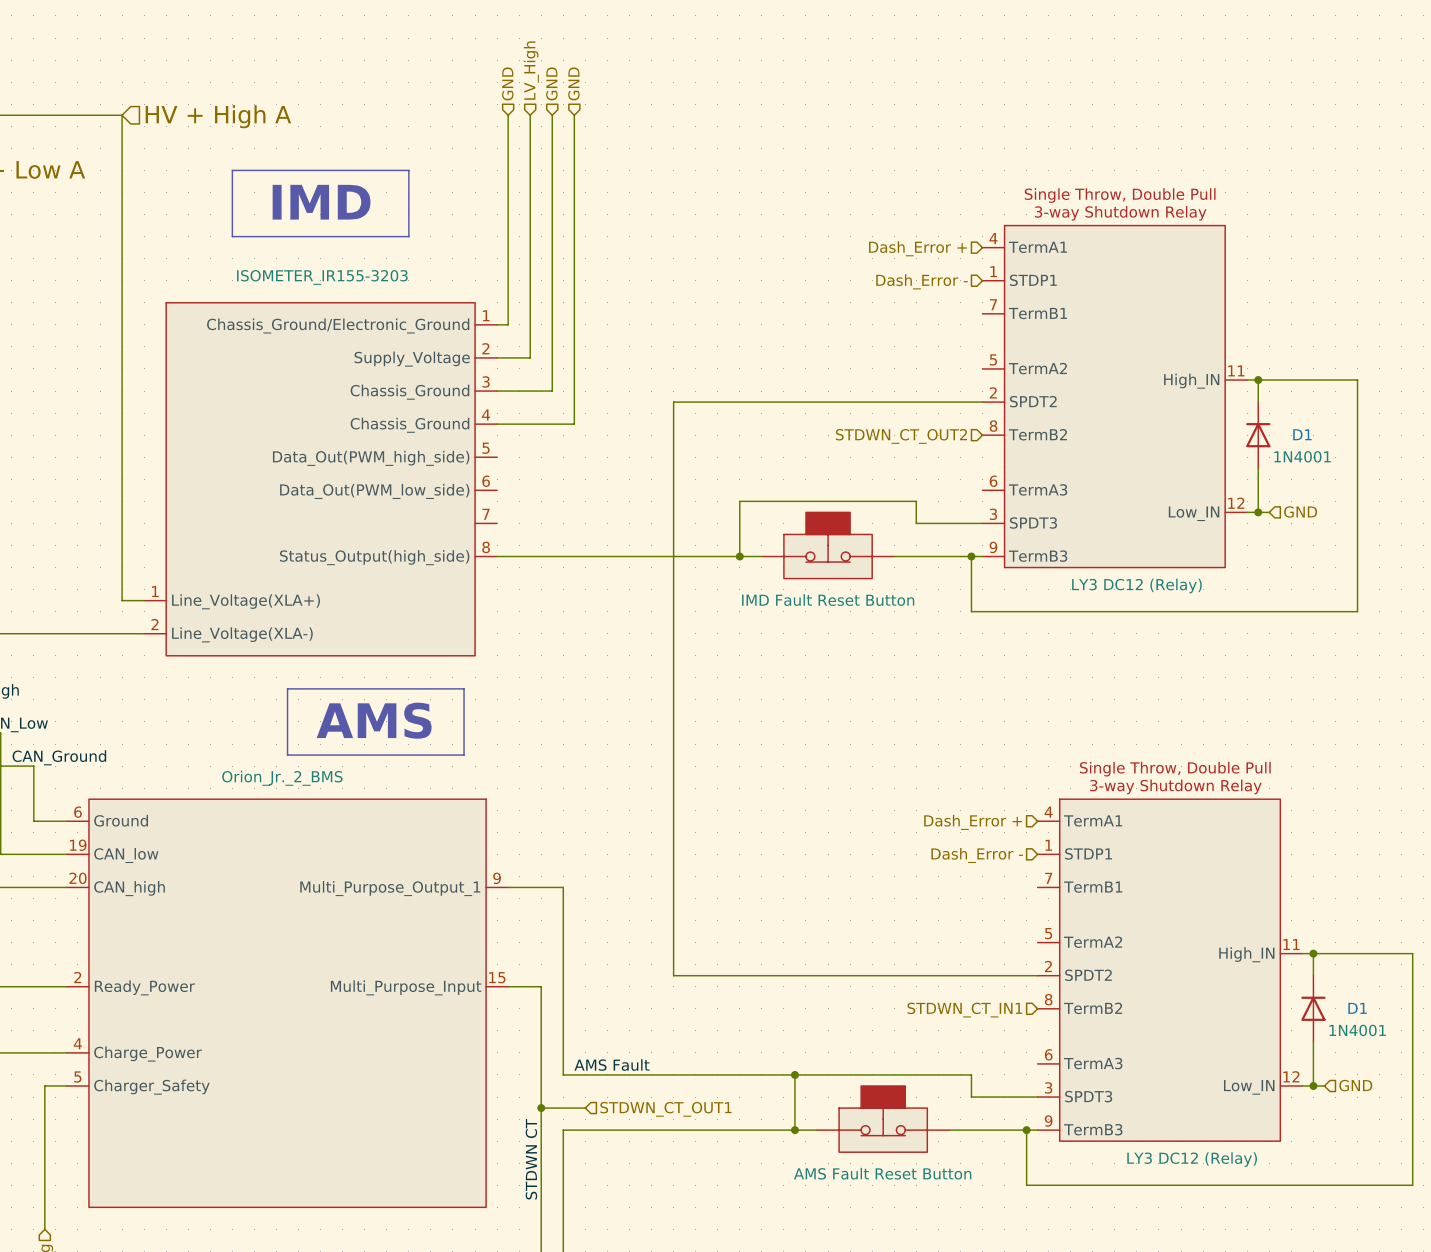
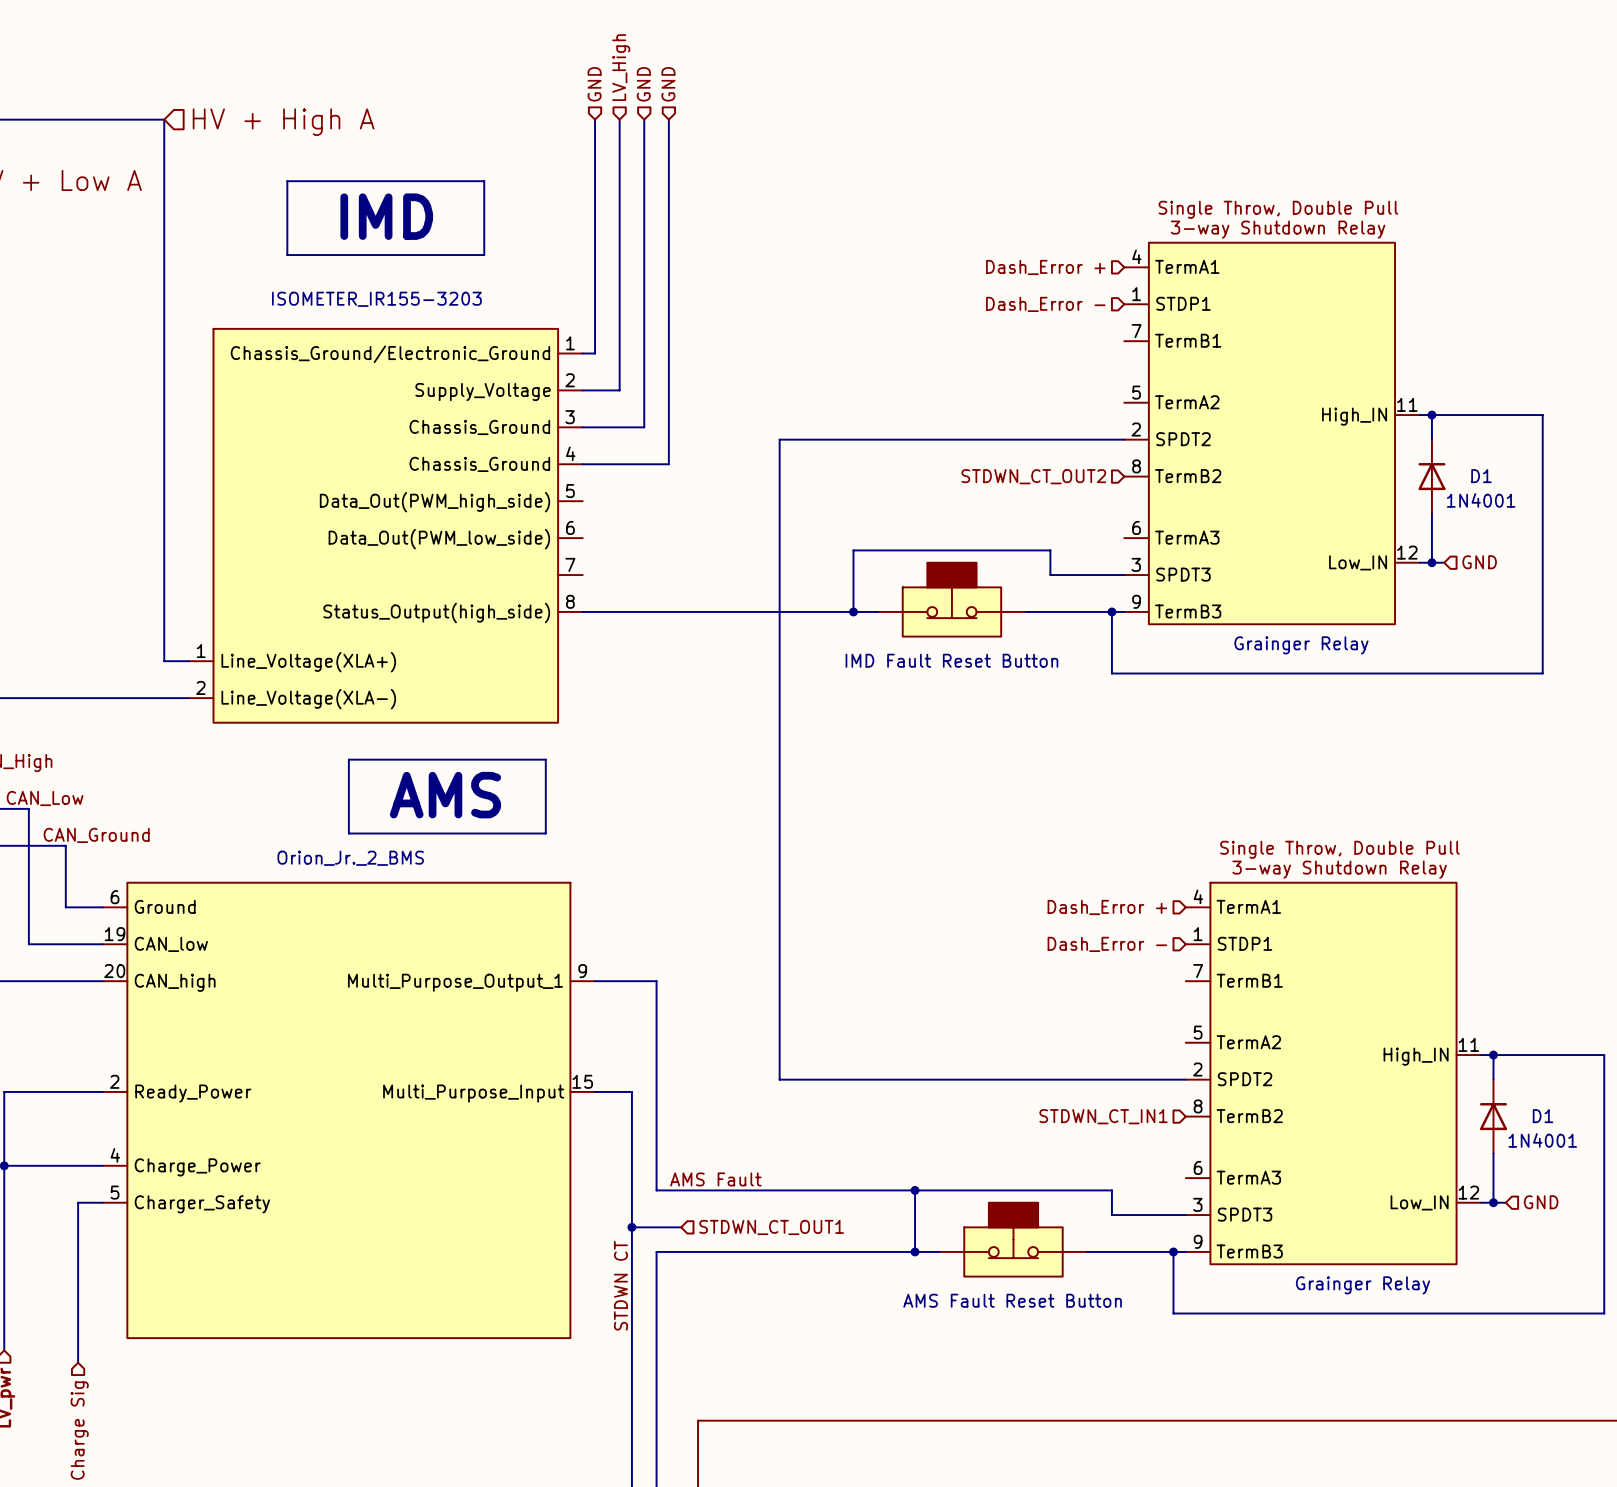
part value: LY3 DC12 (Relay) (1136, 585) -> Grainger Relay (1301, 645)
part value: LY3 DC12 (Relay) (1192, 1159) -> Grainger Relay (1362, 1285)

